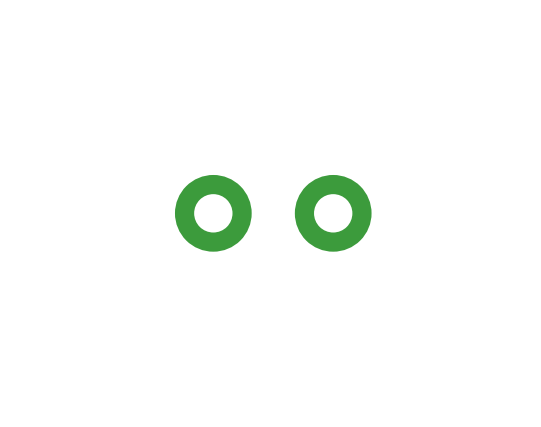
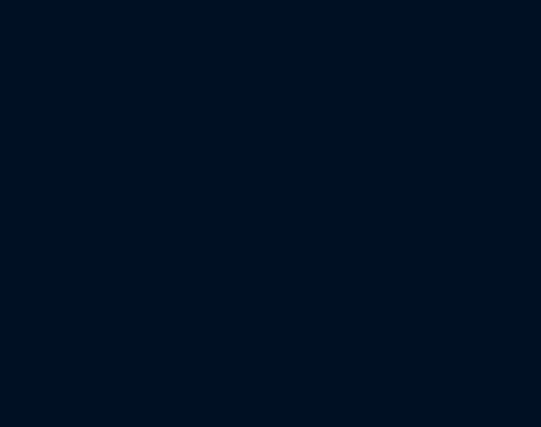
part: (273, 213) -> none

